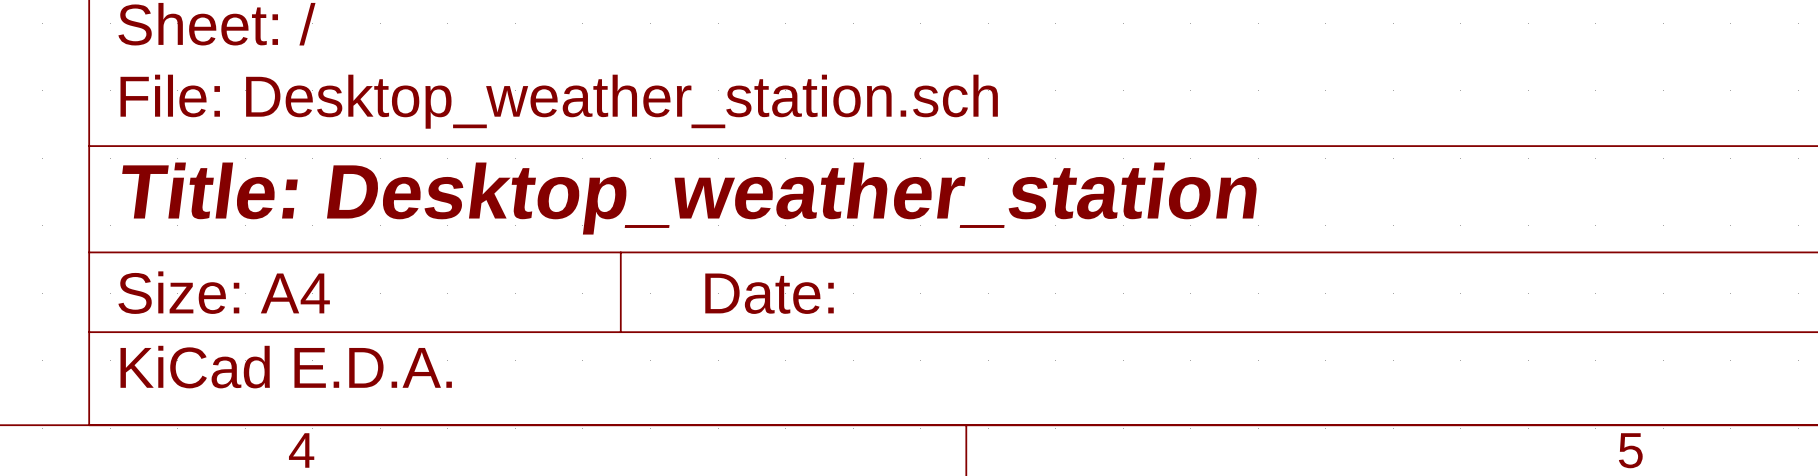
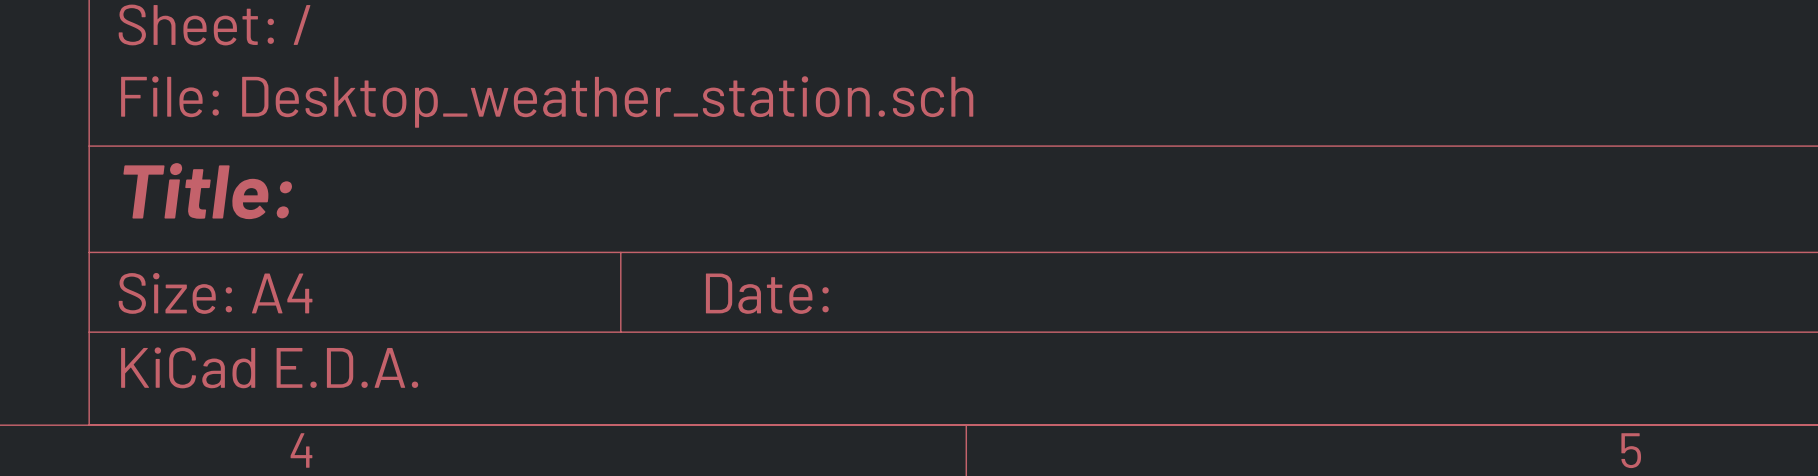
title block: Title: Desktop_weather_station (689, 198) -> Title: (207, 191)

